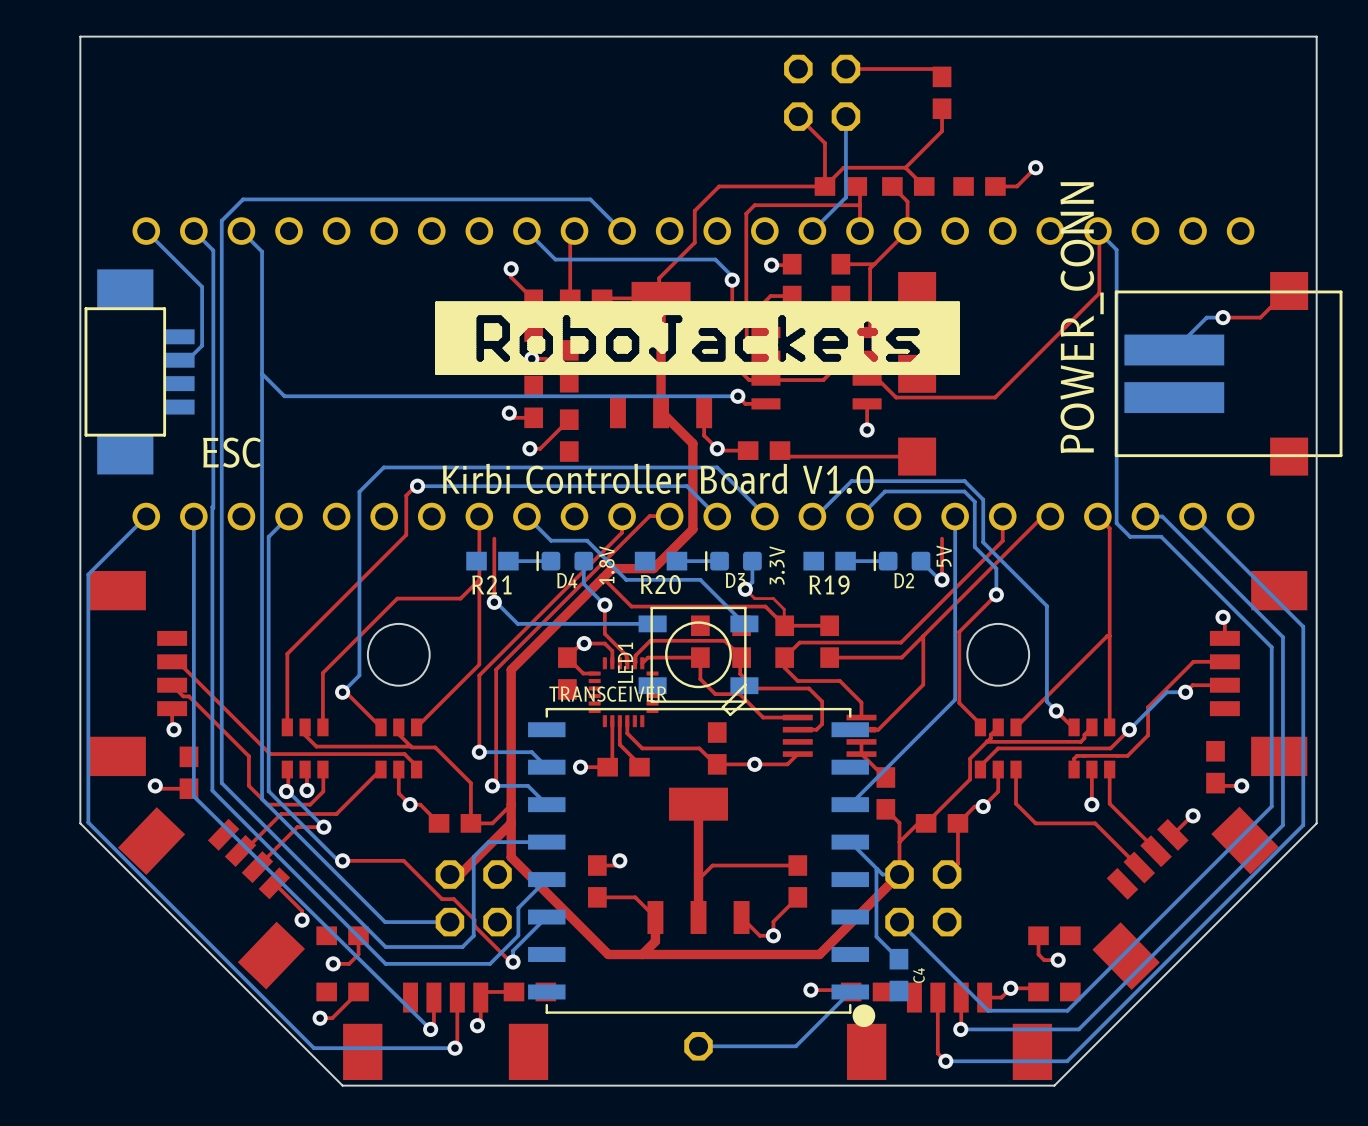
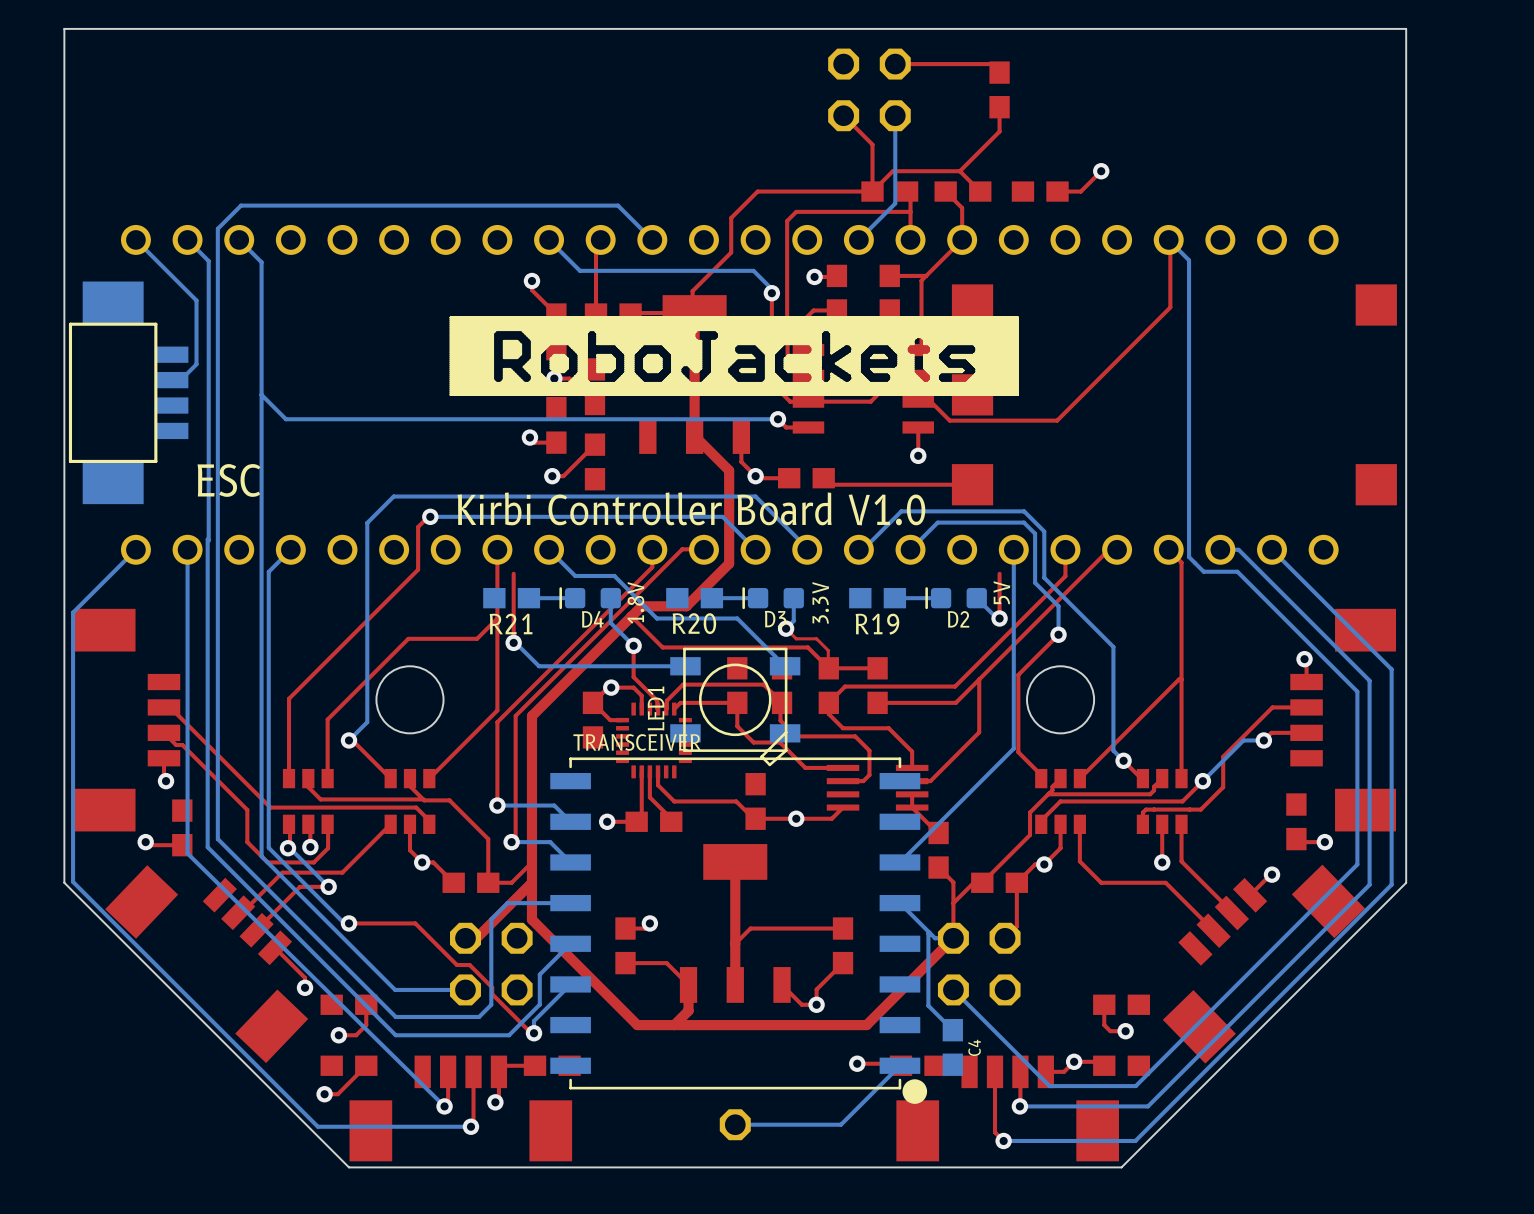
top track: (1279, 298) (1260, 317) (1223, 317) -> none
bottom track: (1223, 317) (1206, 317) (1174, 350) -> none
via: (1223, 317) -> none
POWER_CONN: (1228, 373) -> none

